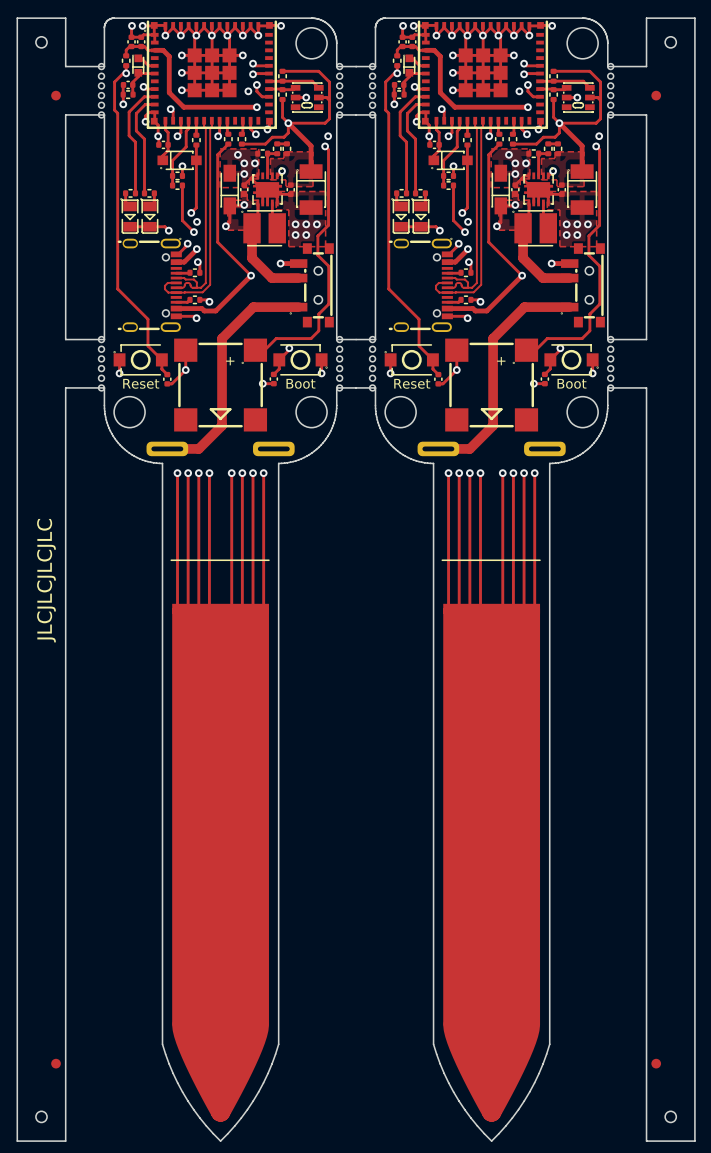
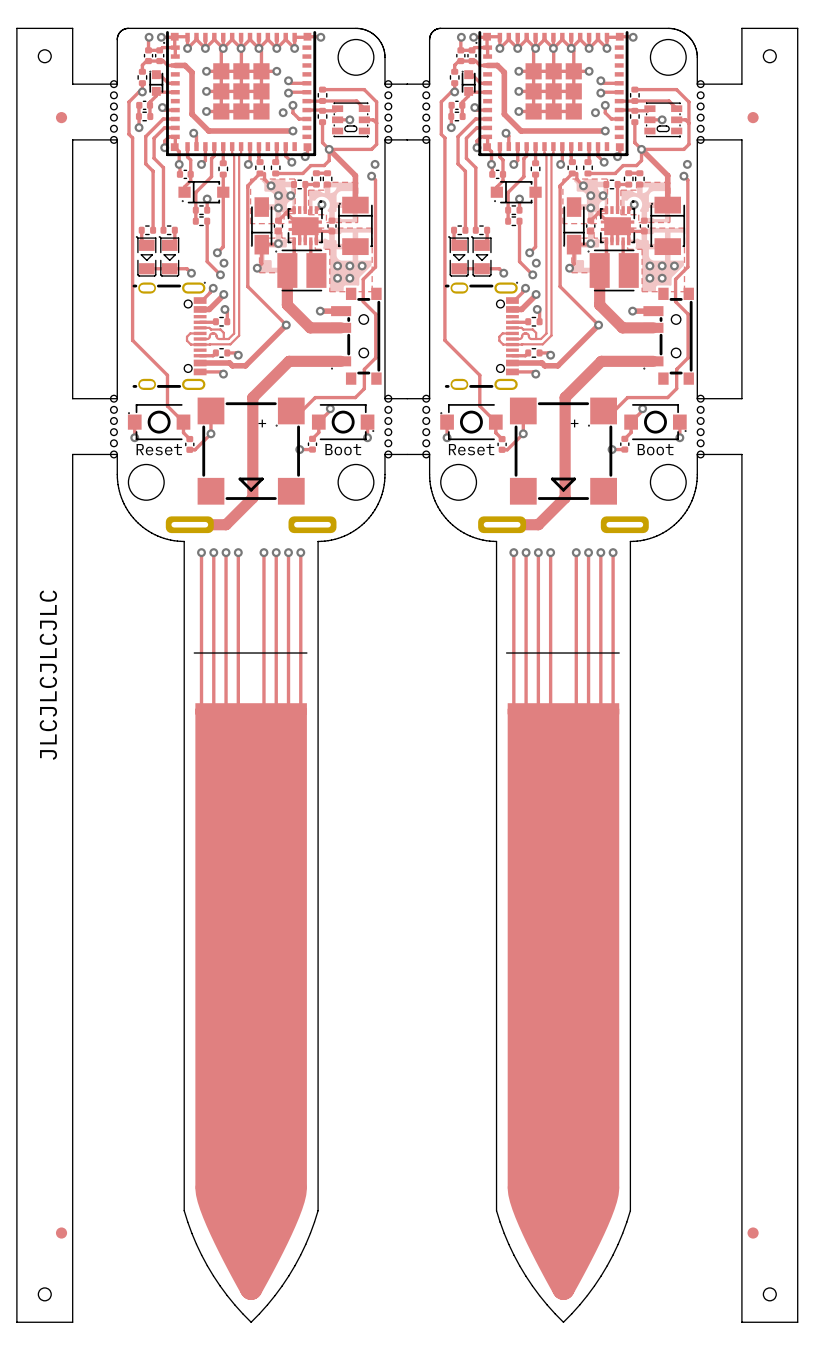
track: none -> (264, 173) (264, 179) (271, 185)
track: none -> (576, 173) (576, 179) (583, 185)

